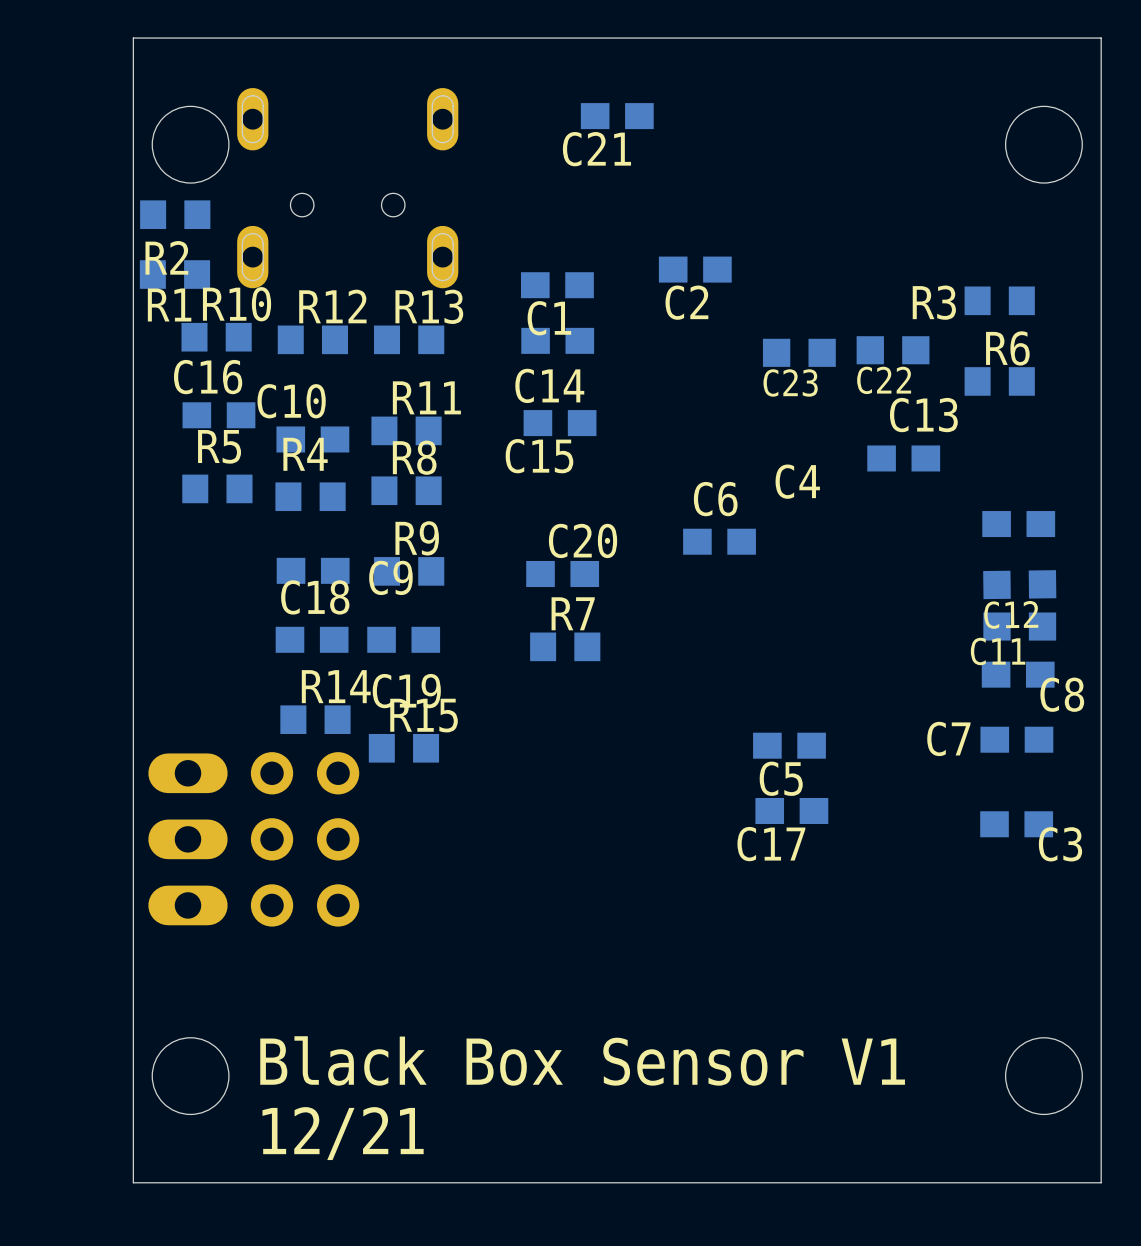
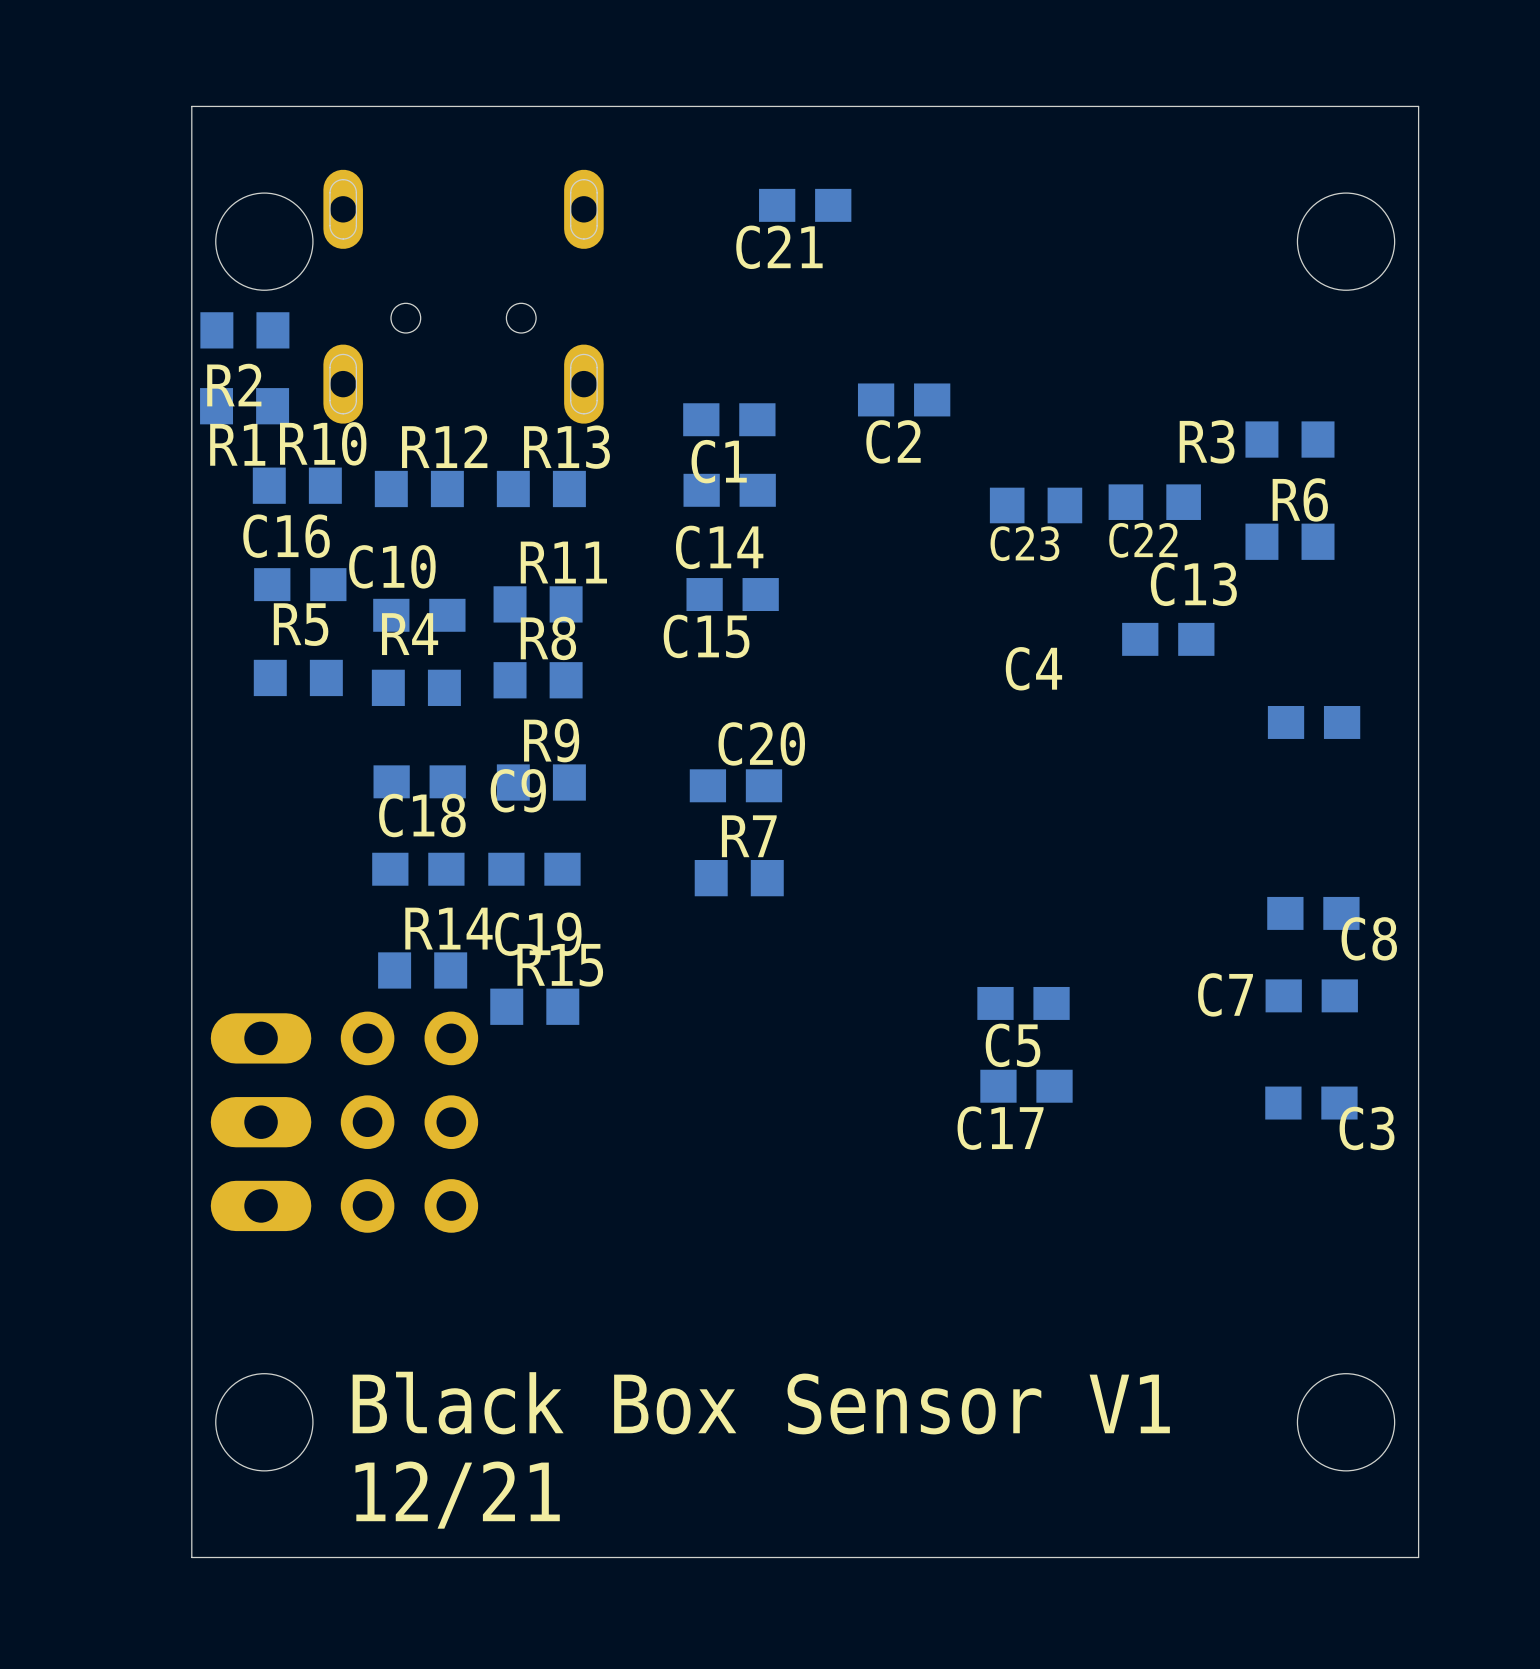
C6: (719, 541) -> none
C12: (1019, 584) -> none
C11: (1019, 626) -> none

